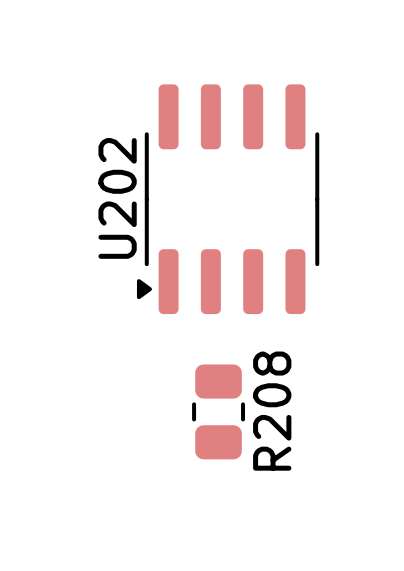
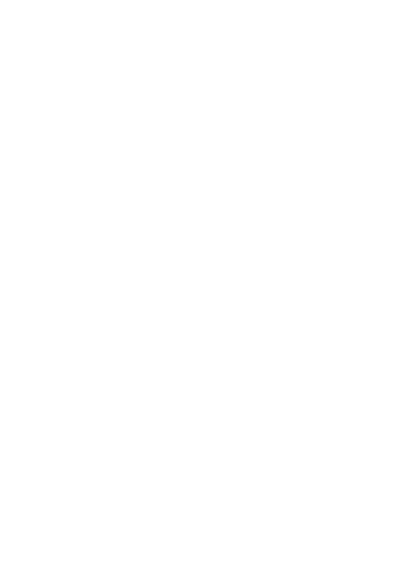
U202: (228, 199) -> none
R208: (218, 411) -> none

